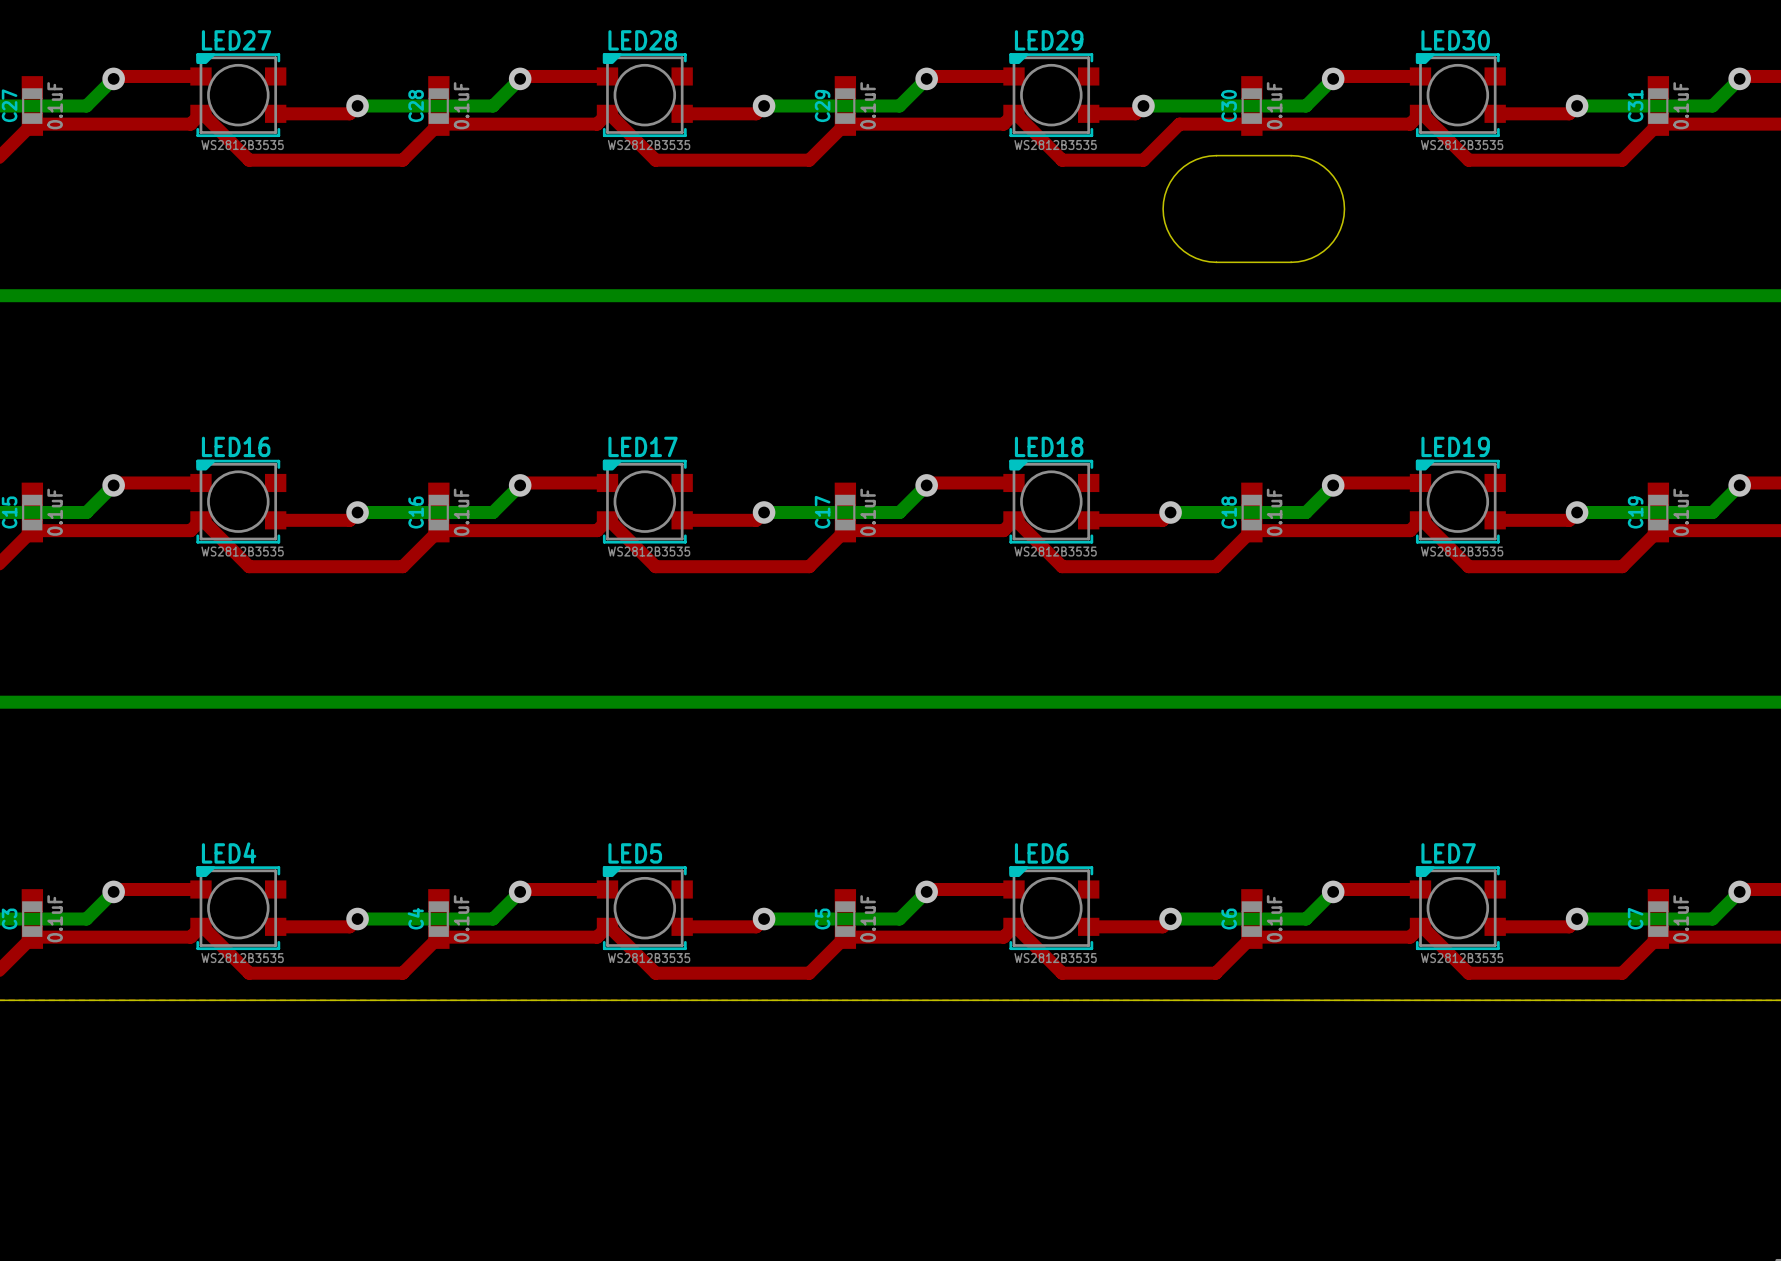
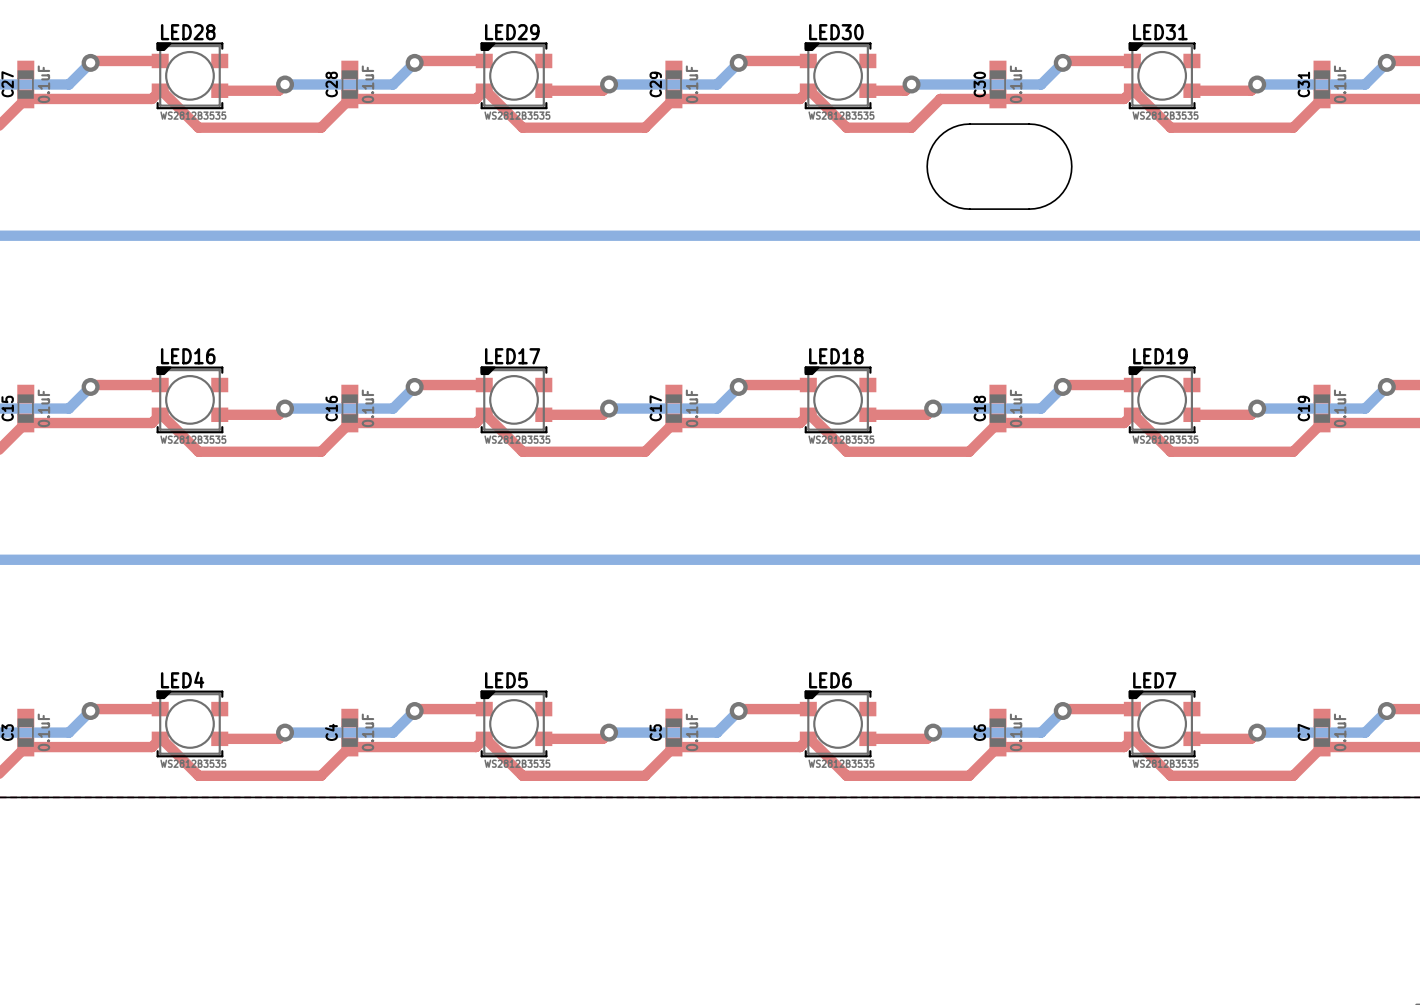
LED27 name: LED27 (236, 40) -> LED28 (188, 32)
LED28 name: LED28 (642, 40) -> LED29 (512, 32)
LED29 name: LED29 (1049, 40) -> LED30 (836, 32)
LED30 name: LED30 (1455, 40) -> LED31 (1160, 32)

